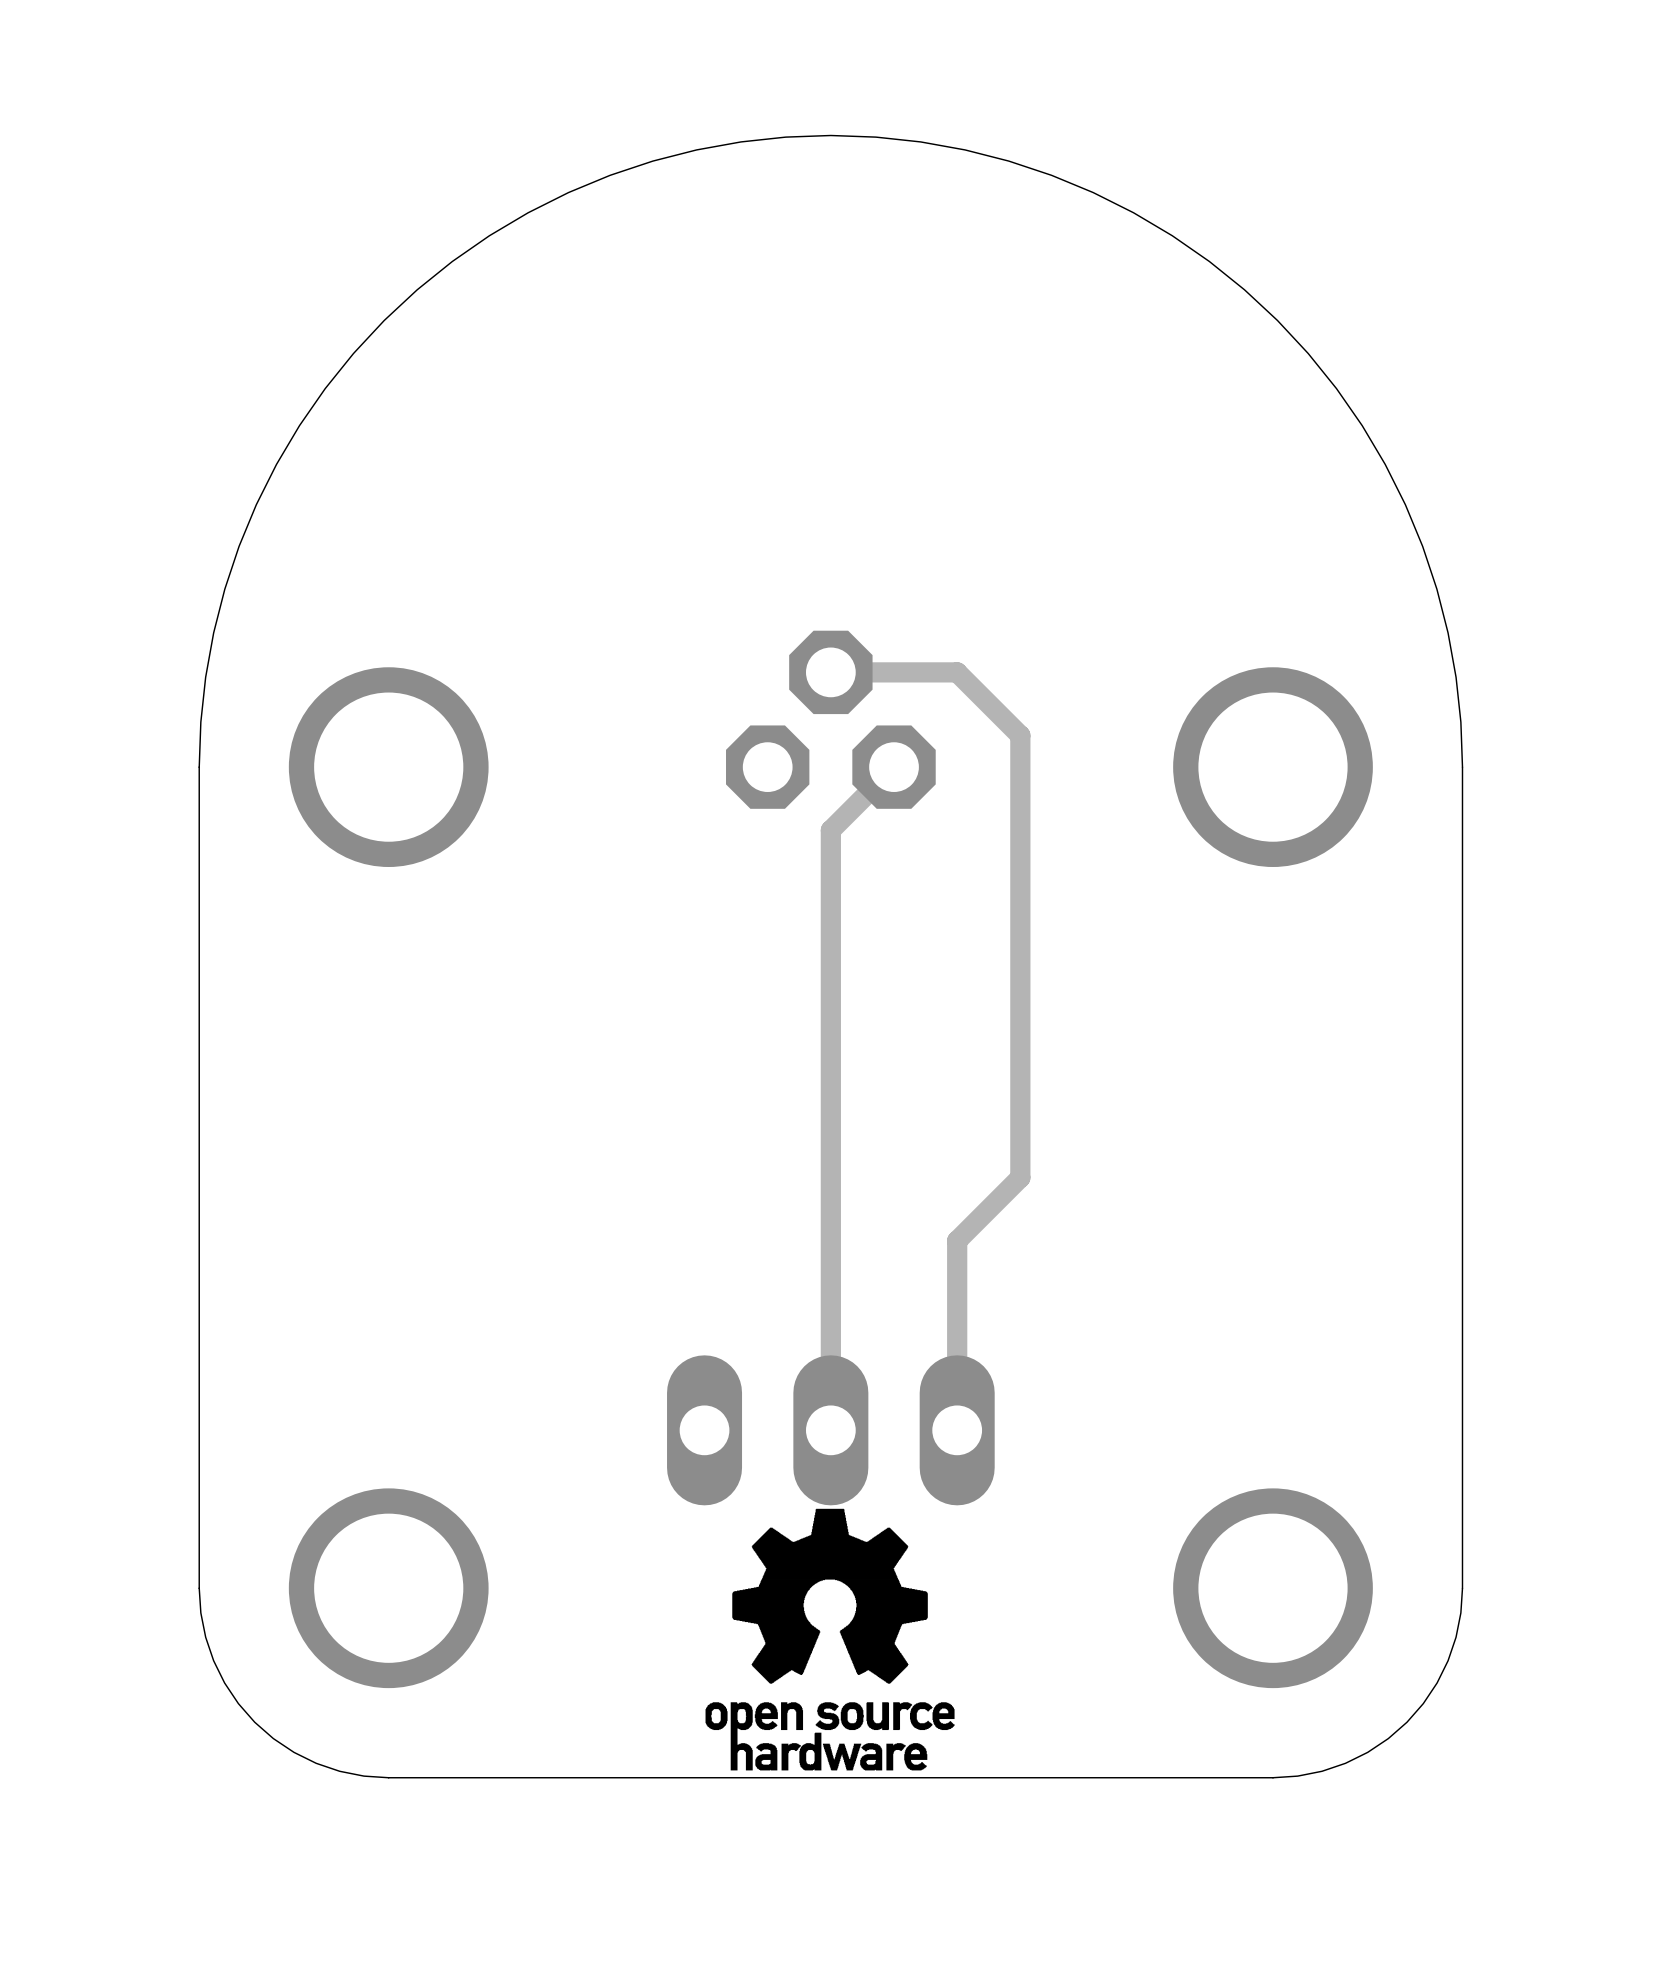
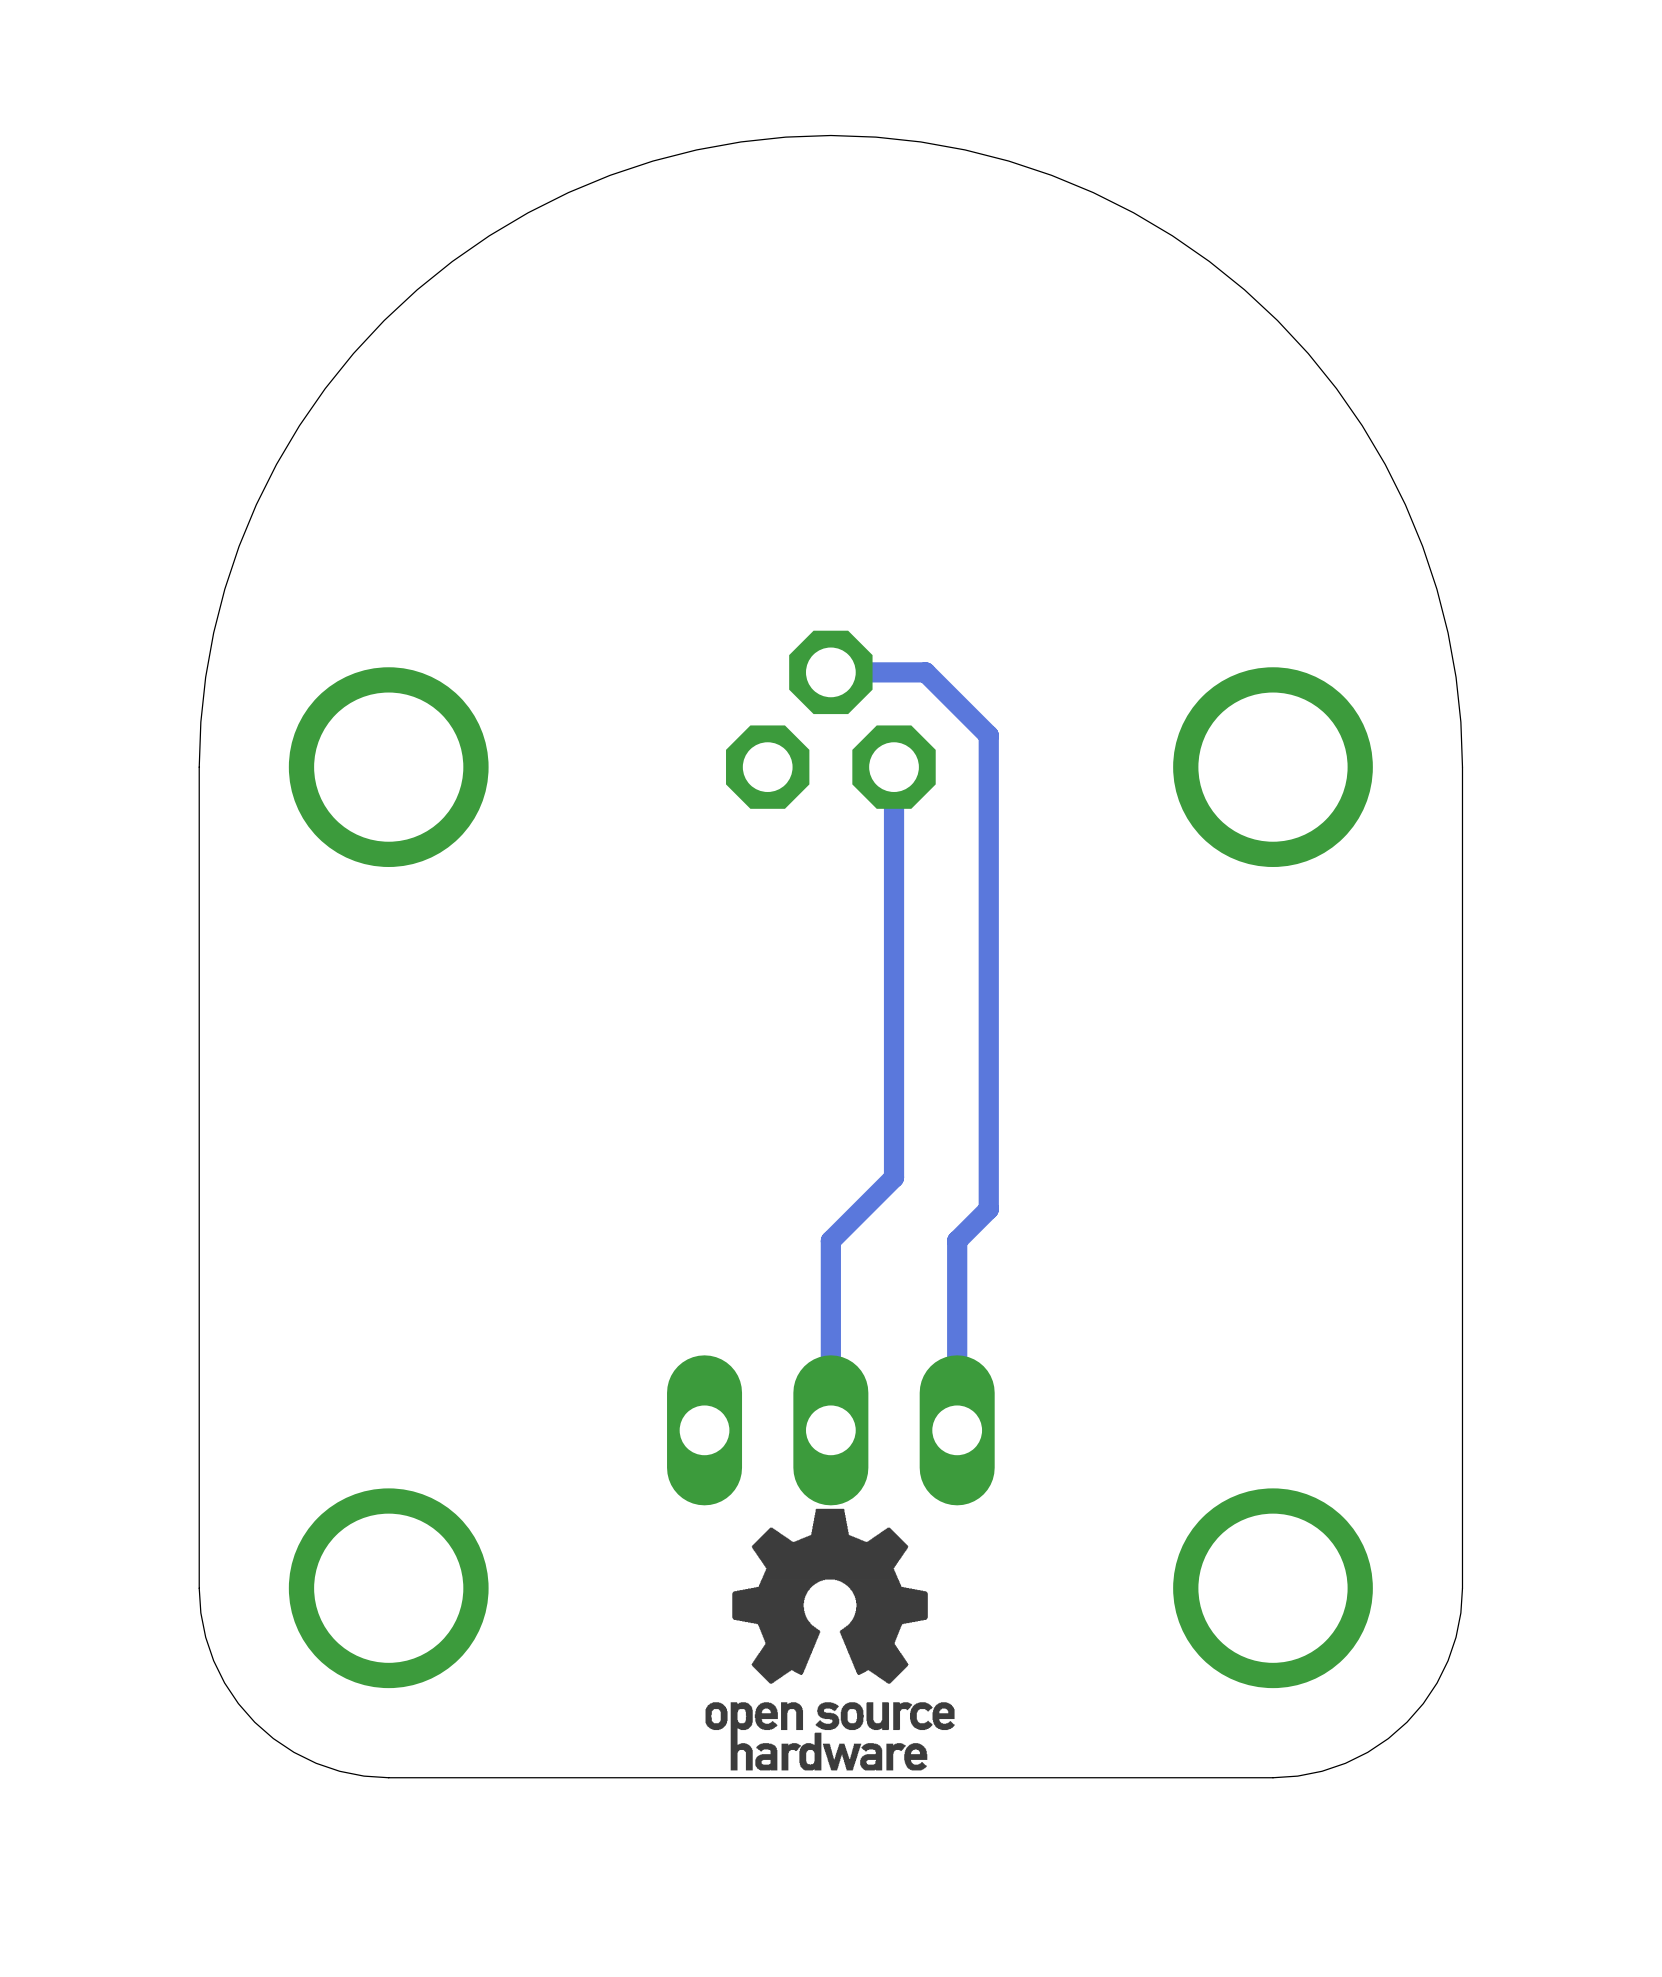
track: (925, 672) (957, 672) (1020, 735) (1020, 1177) (988, 1209) -> (925, 672) (988, 735) (988, 1209)
track: (894, 767) (830, 830) (830, 1240) -> (894, 767) (894, 1177) (830, 1240)

